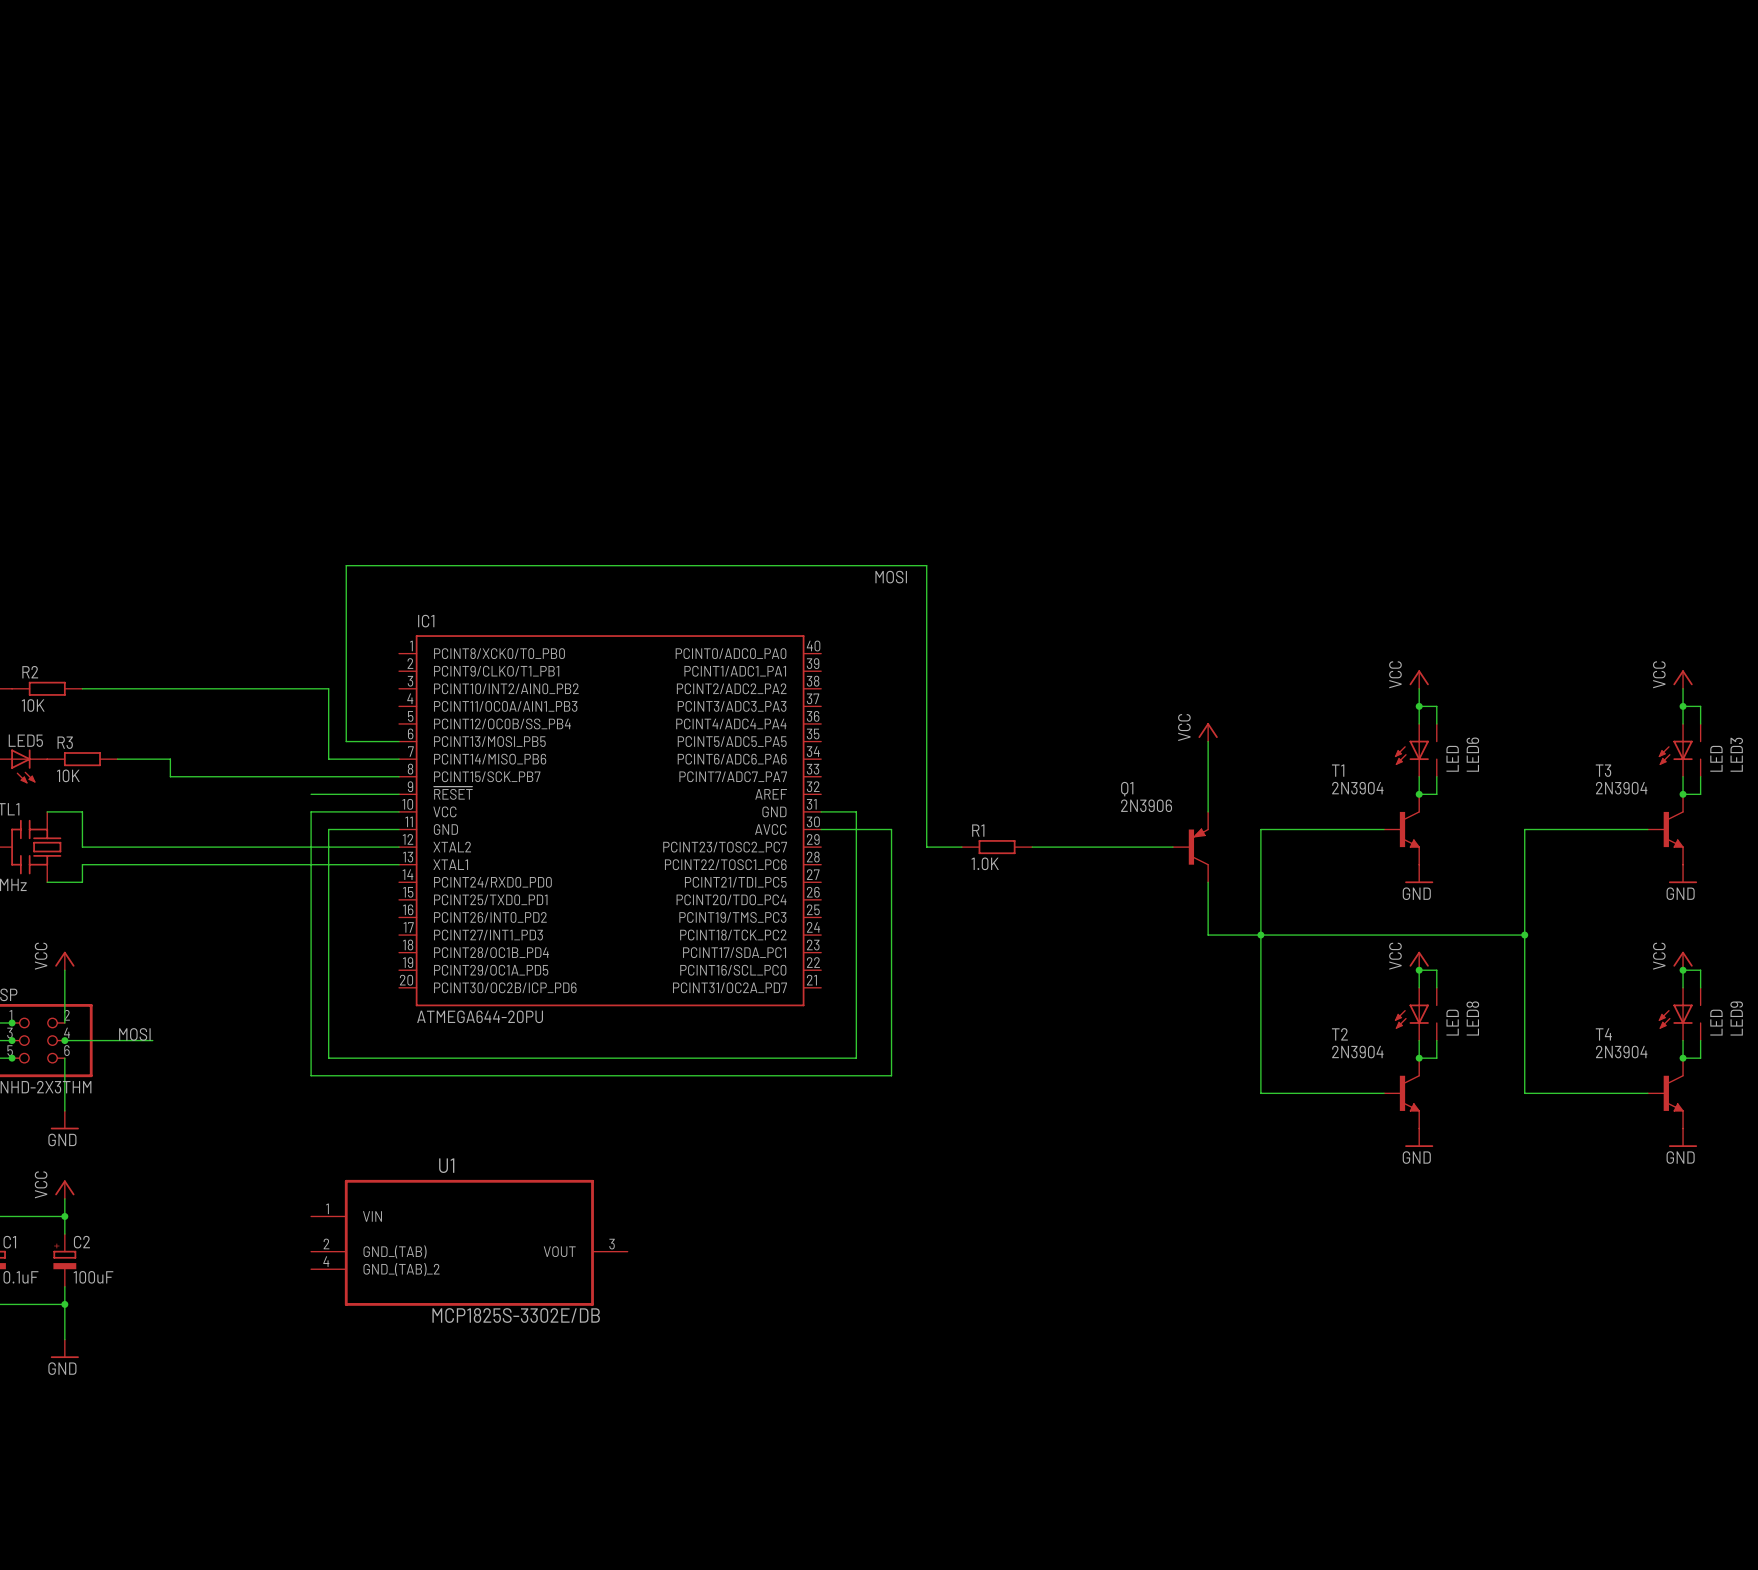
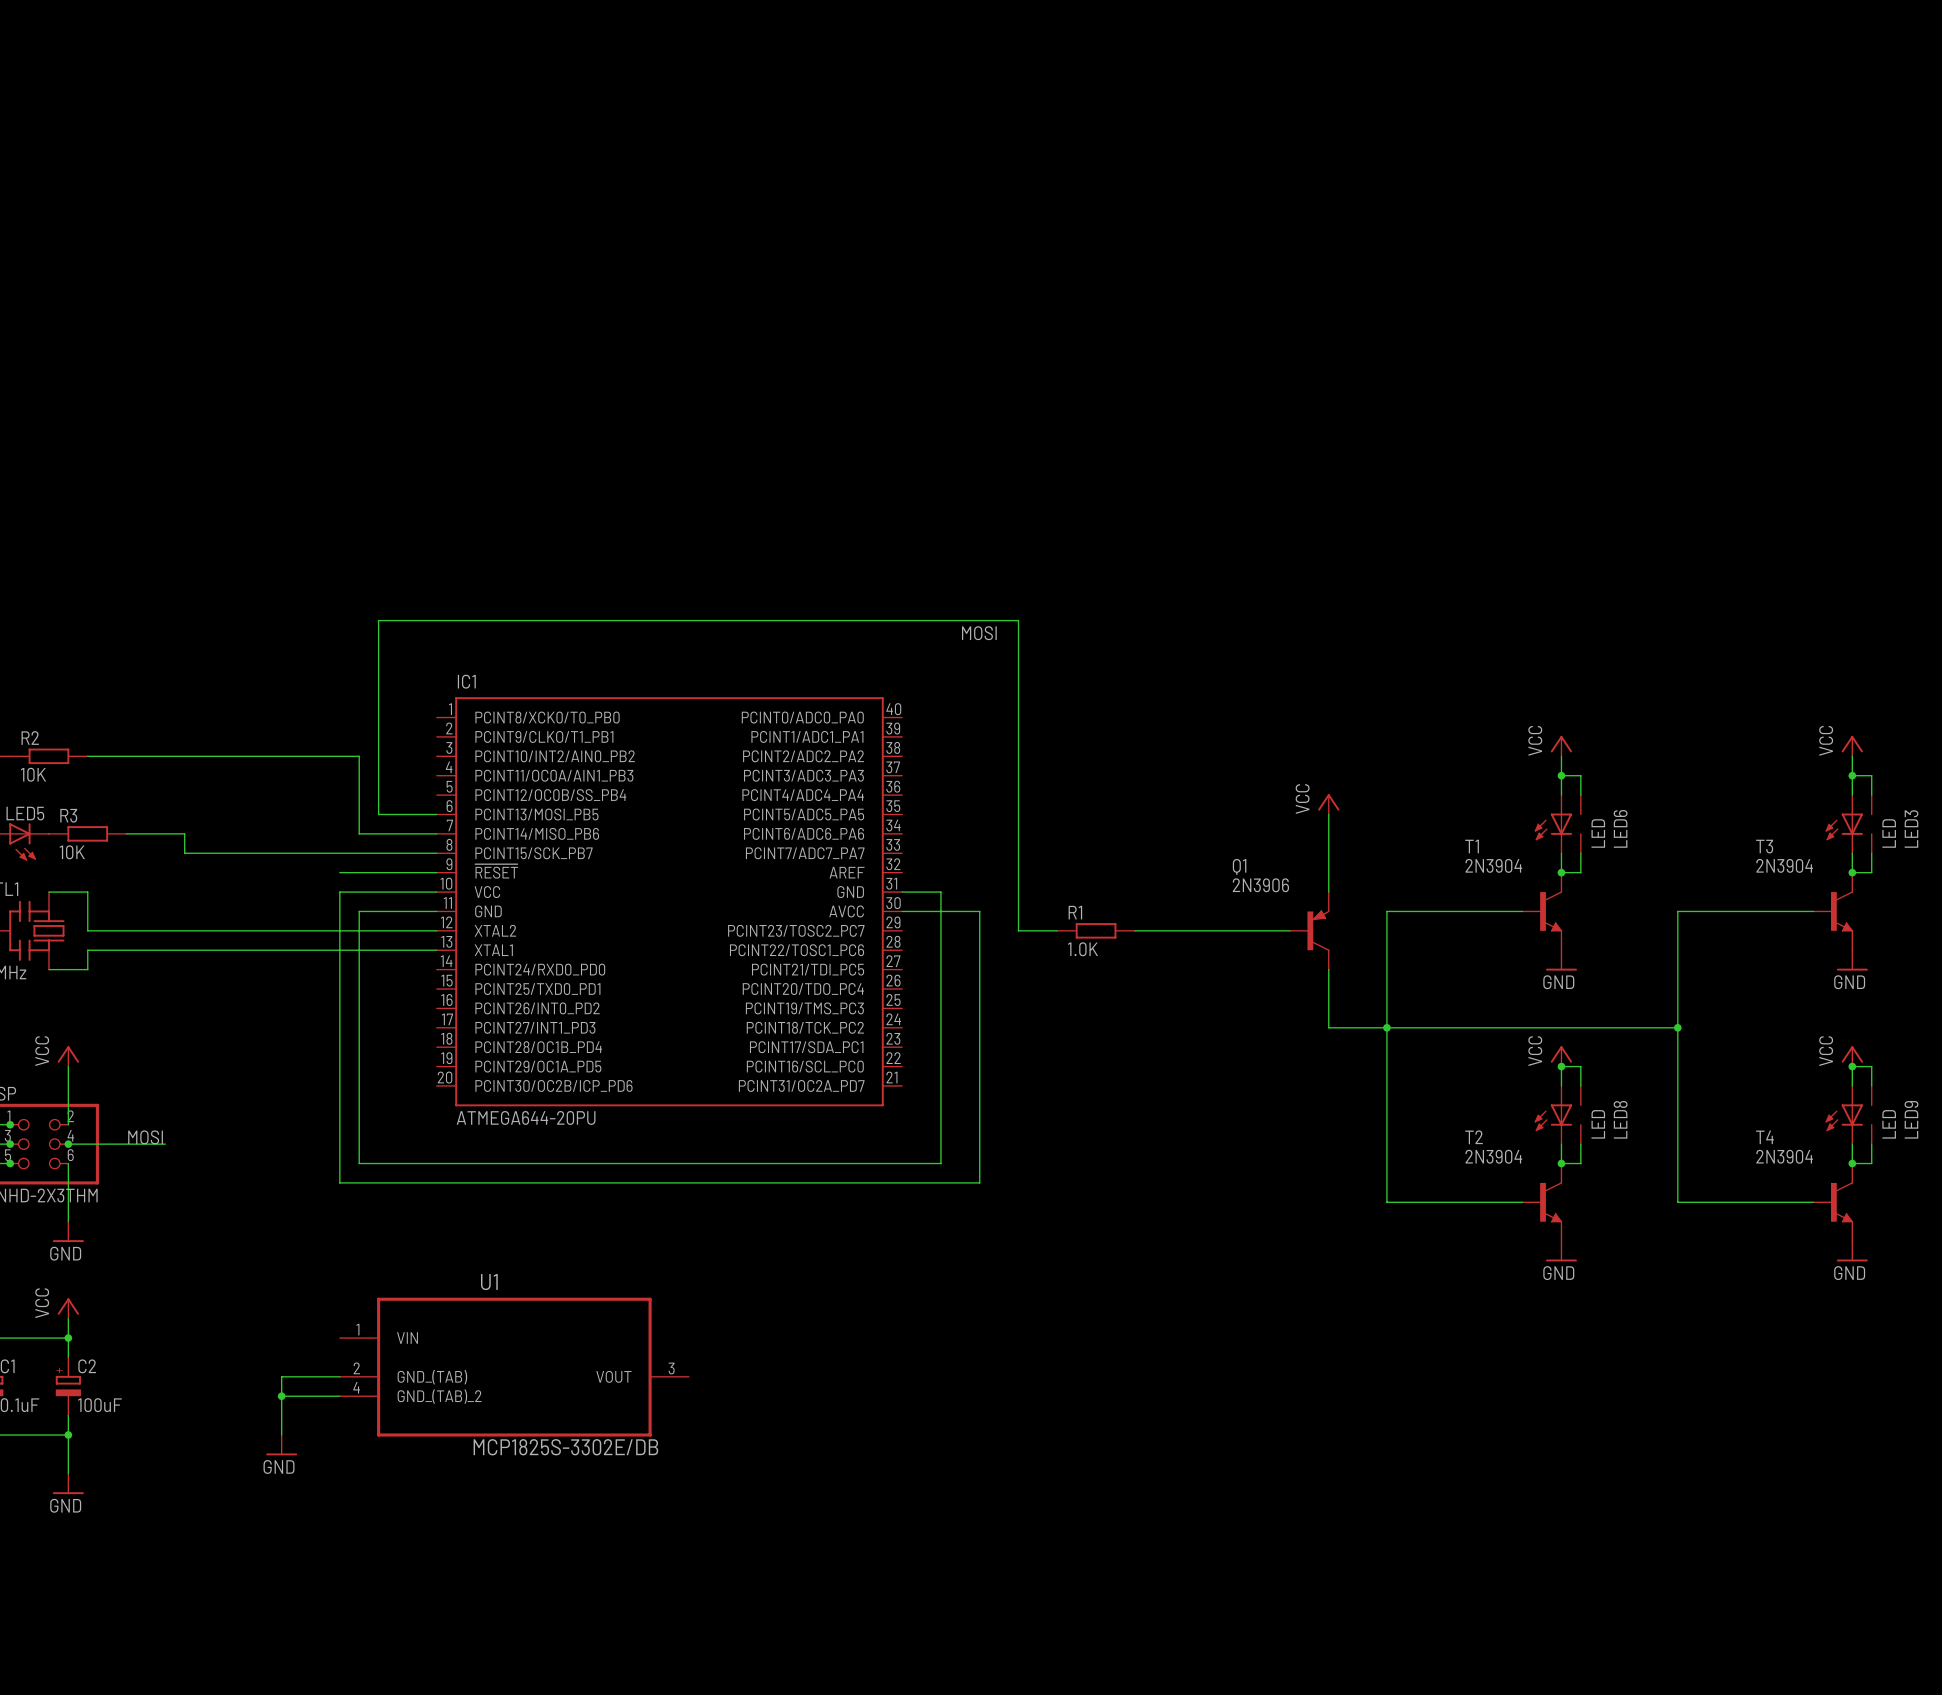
wire: none -> (339, 1376) (281, 1376) (281, 1435)
wire: none -> (281, 1396) (339, 1396)
junction: none -> (281, 1396)
power symbol: none -> GND (281, 1445)

